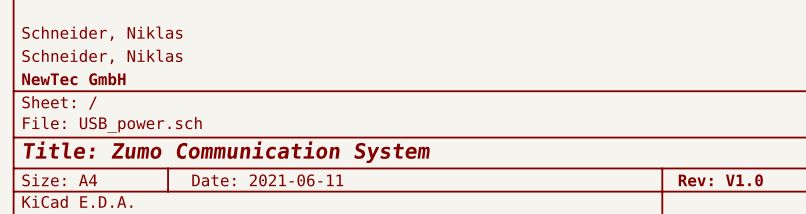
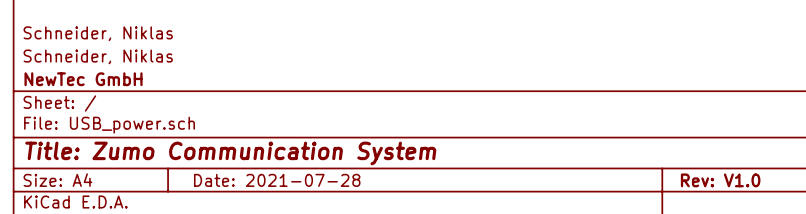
title block: Date: 2021-06-11 (267, 180) -> Date: 2021-07-28 (277, 180)

